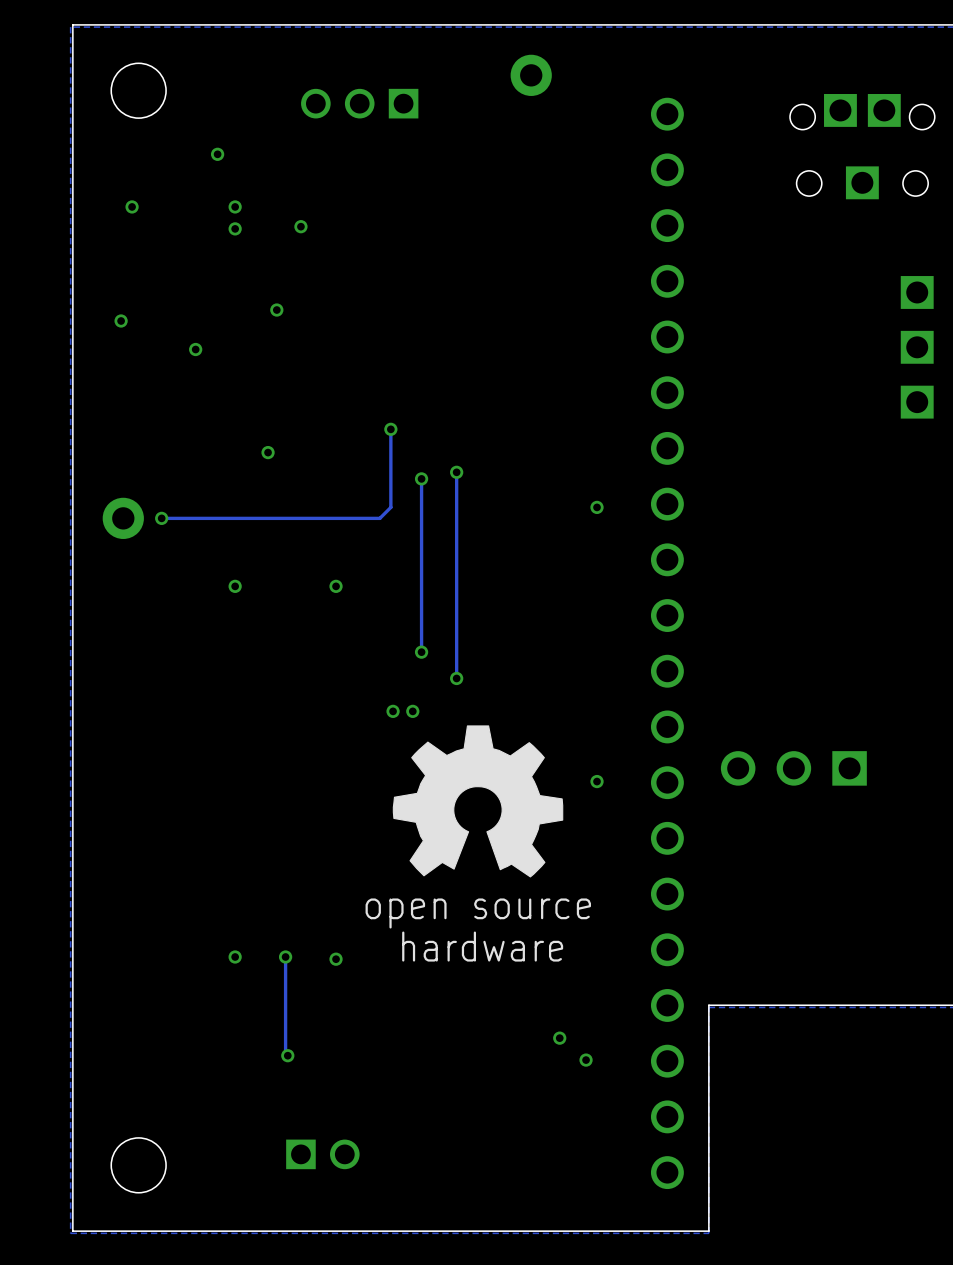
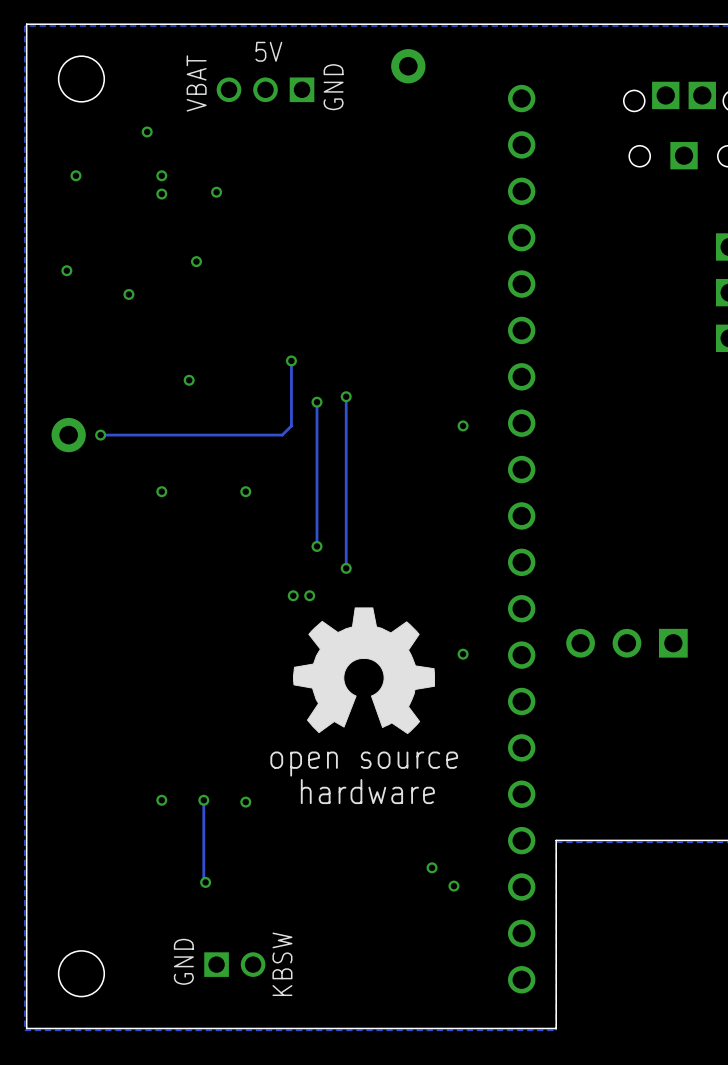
text: none -> 5V (268, 51)
text: none -> VBAT (196, 83)
text: none -> GND (333, 87)
text: none -> GND (183, 961)
text: none -> KBSW (282, 964)

